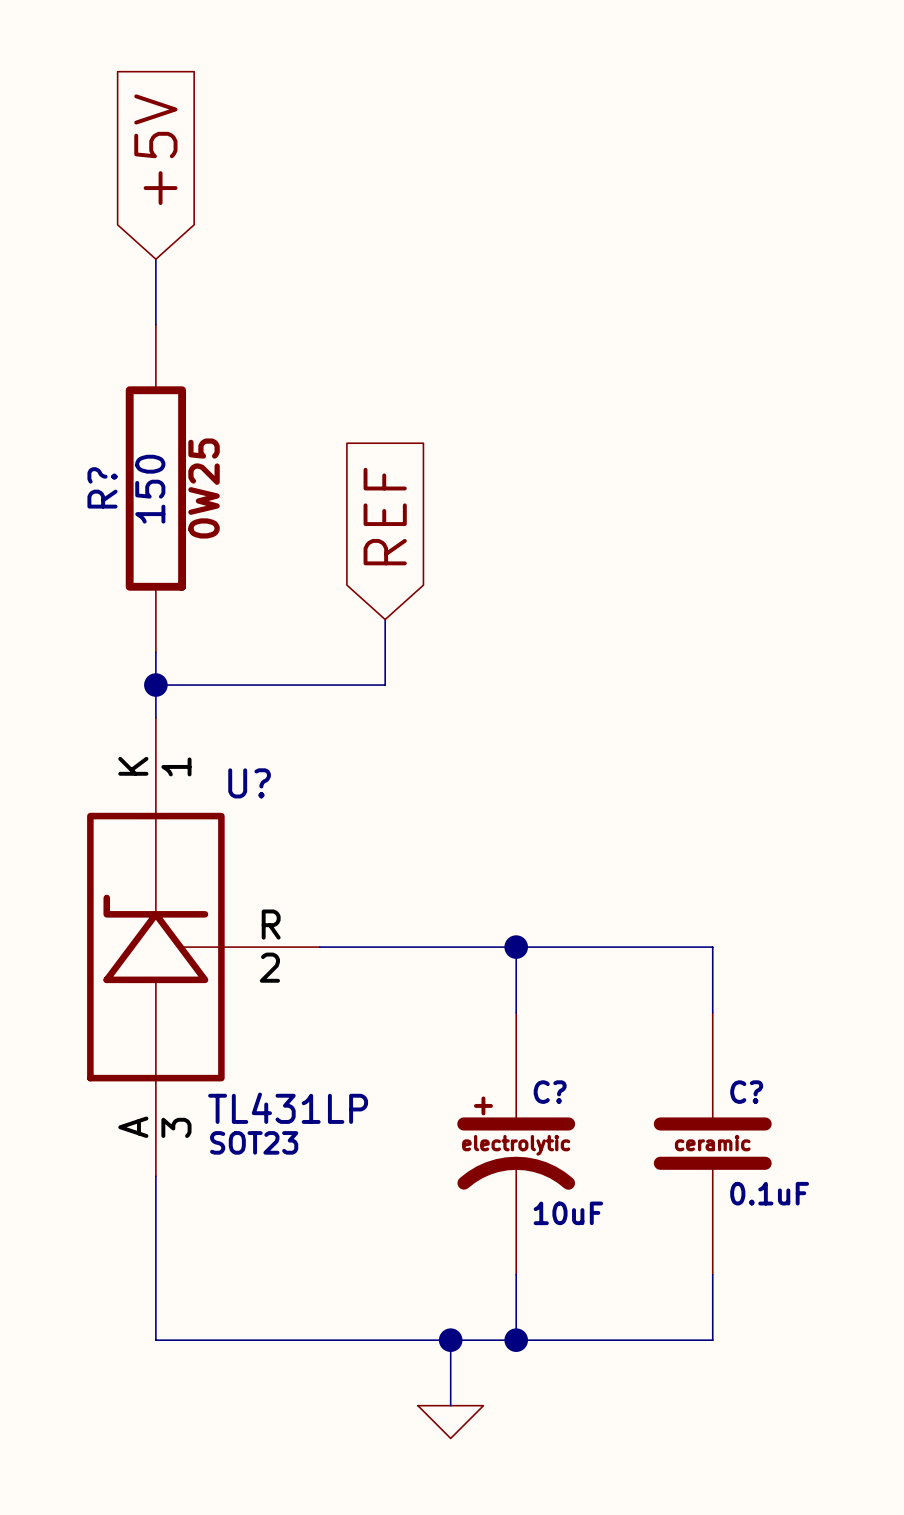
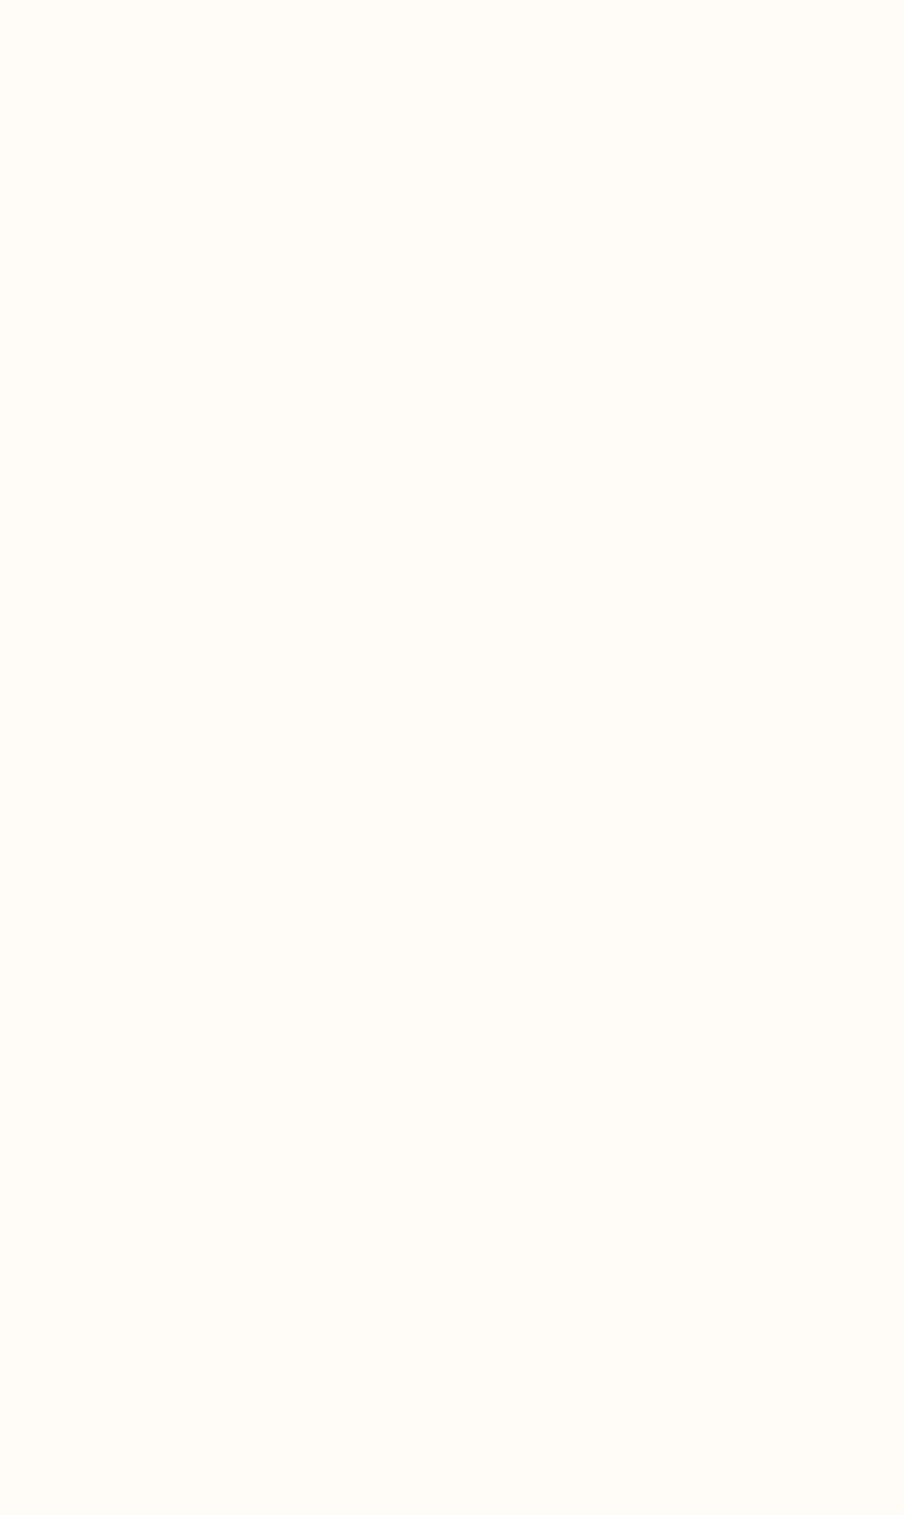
global label: +5V (155, 149) -> none
wire: (155, 259) (155, 324) -> none
R?: 150 (155, 488) -> none
global label: REF (385, 516) -> none
wire: (385, 619) (385, 685) (155, 685) -> none
wire: (155, 652) (155, 717) -> none
junction: (155, 685) -> none
U?: TL431LP (203, 947) -> none
wire: (319, 947) (712, 947) (712, 1012) -> none
wire: (516, 947) (516, 1012) -> none
junction: (516, 947) -> none
C?: 10uF (516, 1143) -> none
C?: 0.1uF (712, 1143) -> none
wire: (155, 1176) (155, 1340) (712, 1340) (712, 1274) -> none
wire: (516, 1274) (516, 1340) -> none
wire: (450, 1340) (450, 1405) -> none
junction: (450, 1340) -> none
junction: (516, 1340) -> none
power symbol: (450, 1422) -> none

